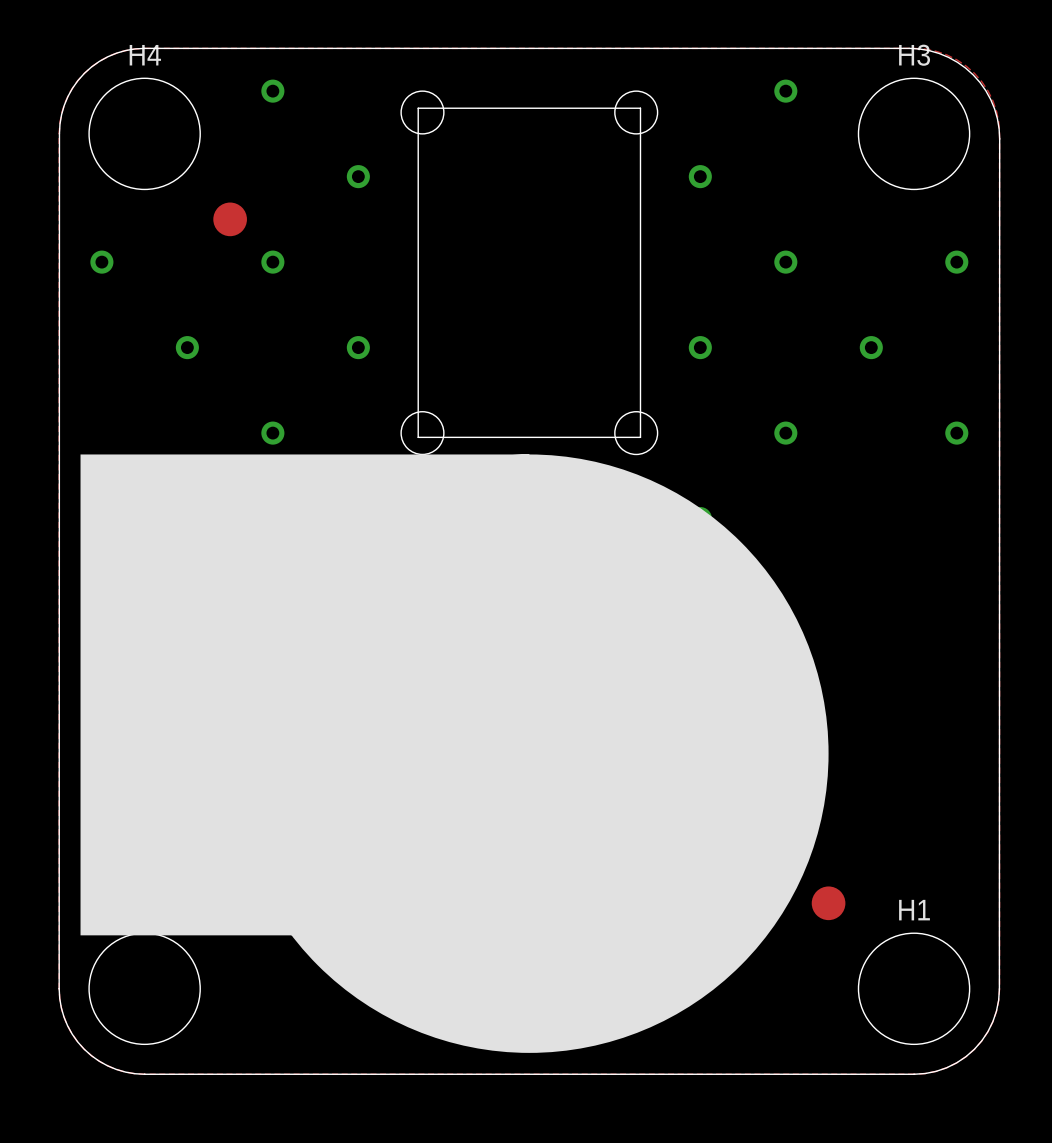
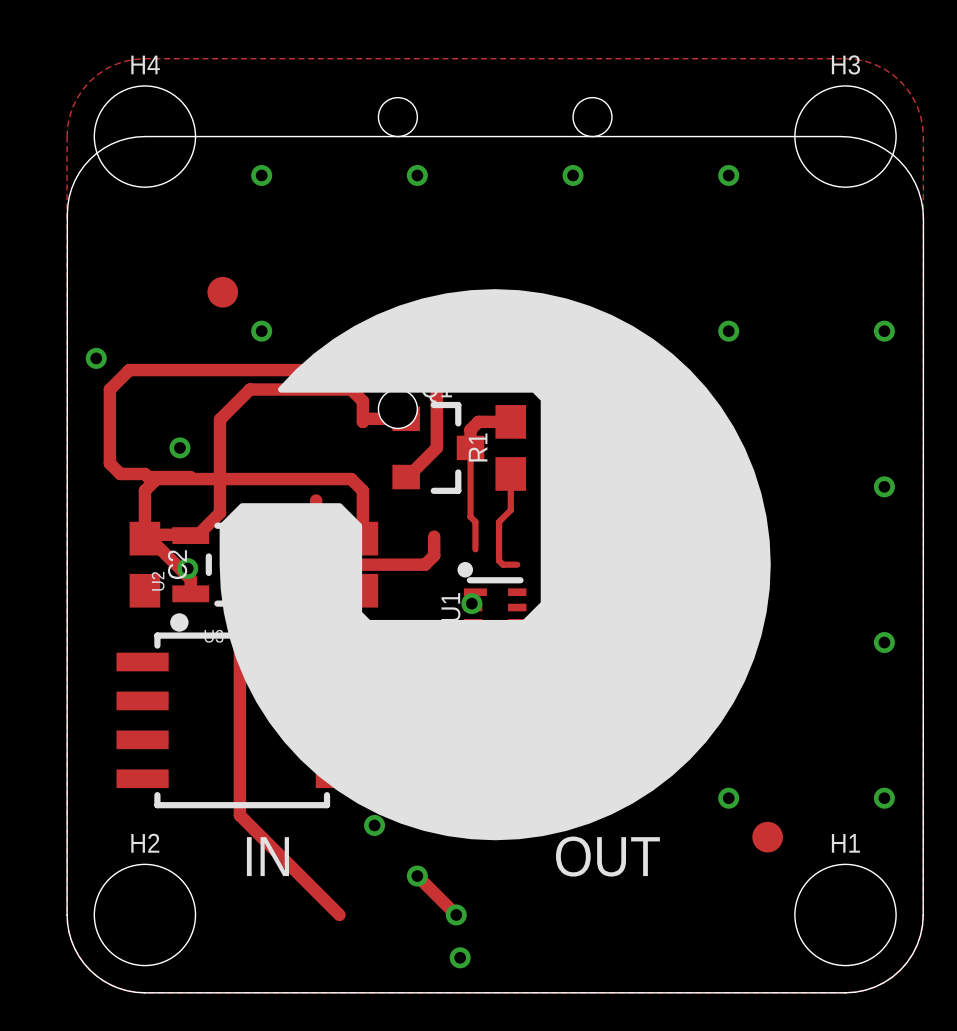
via: (272, 91) -> none
via: (785, 91) -> none
board edge: (418, 108) (418, 437) (640, 437) (640, 108) (418, 108) -> none
via: none -> (261, 175)
via: (358, 176) -> none
via: none -> (417, 175)
via: none -> (573, 175)
via: (700, 176) -> none
via: none -> (728, 175)
board edge: (59, 219) (59, 124) (67, 96) (78, 80) (99, 61) (116, 53) (135, 48) (909, 48) (939, 53) (965, 68) (979, 82) (990, 99) (997, 118) (999, 138) (999, 989) -> (67, 214) (71, 188) (84, 165) (103, 148) (119, 140) (136, 137) (841, 136) (868, 141) (892, 154) (905, 167) (915, 183) (921, 200) (923, 218) (923, 915)
part position: (230, 219) -> (222, 292)
via: (101, 262) -> none
via: (272, 262) -> none
via: (785, 262) -> none
via: (956, 262) -> none
drawing: none -> [219, 289, 771, 841]
via: (187, 347) -> none
via: none -> (261, 331)
via: (358, 347) -> none
via: (700, 347) -> none
via: none -> (728, 331)
via: (871, 347) -> none
via: none -> (884, 331)
via: none -> (96, 358)
via: (272, 433) -> none
via: (785, 433) -> none
via: (956, 433) -> none
track: none -> (406, 418) (365, 418) (362, 421) (362, 401) (351, 389) (250, 389) (219, 419) (219, 512) (198, 534) (142, 534)
track: none -> (510, 421) (478, 421) (470, 429) (470, 516) (475, 521) (475, 549)
drawing: [80, 454, 829, 1053] -> none
via: none -> (179, 447)
part: none -> (438, 447)
R1: none -> (510, 447)
track: none -> (510, 473) (510, 510) (499, 521) (499, 560) (502, 564) (517, 564)
track: none -> (190, 477) (147, 477) (144, 473) (120, 473) (109, 463) (109, 389) (129, 370) (421, 370) (436, 385) (436, 447) (406, 477)
via: none -> (884, 486)
track: none -> (434, 536) (434, 555) (425, 564) (343, 564) (313, 594) (280, 594)
via: none -> (187, 568)
track: none -> (280, 574) (251, 574) (239, 586) (239, 815) (339, 914)
via: none -> (471, 603)
via: none -> (884, 642)
via: none -> (728, 798)
via: none -> (884, 798)
via: none -> (374, 825)
text: none -> IN (267, 856)
text: none -> OUT (607, 856)
track: none -> (417, 876) (456, 914)
via: none -> (417, 876)
via: none -> (456, 914)
via: none -> (460, 957)

